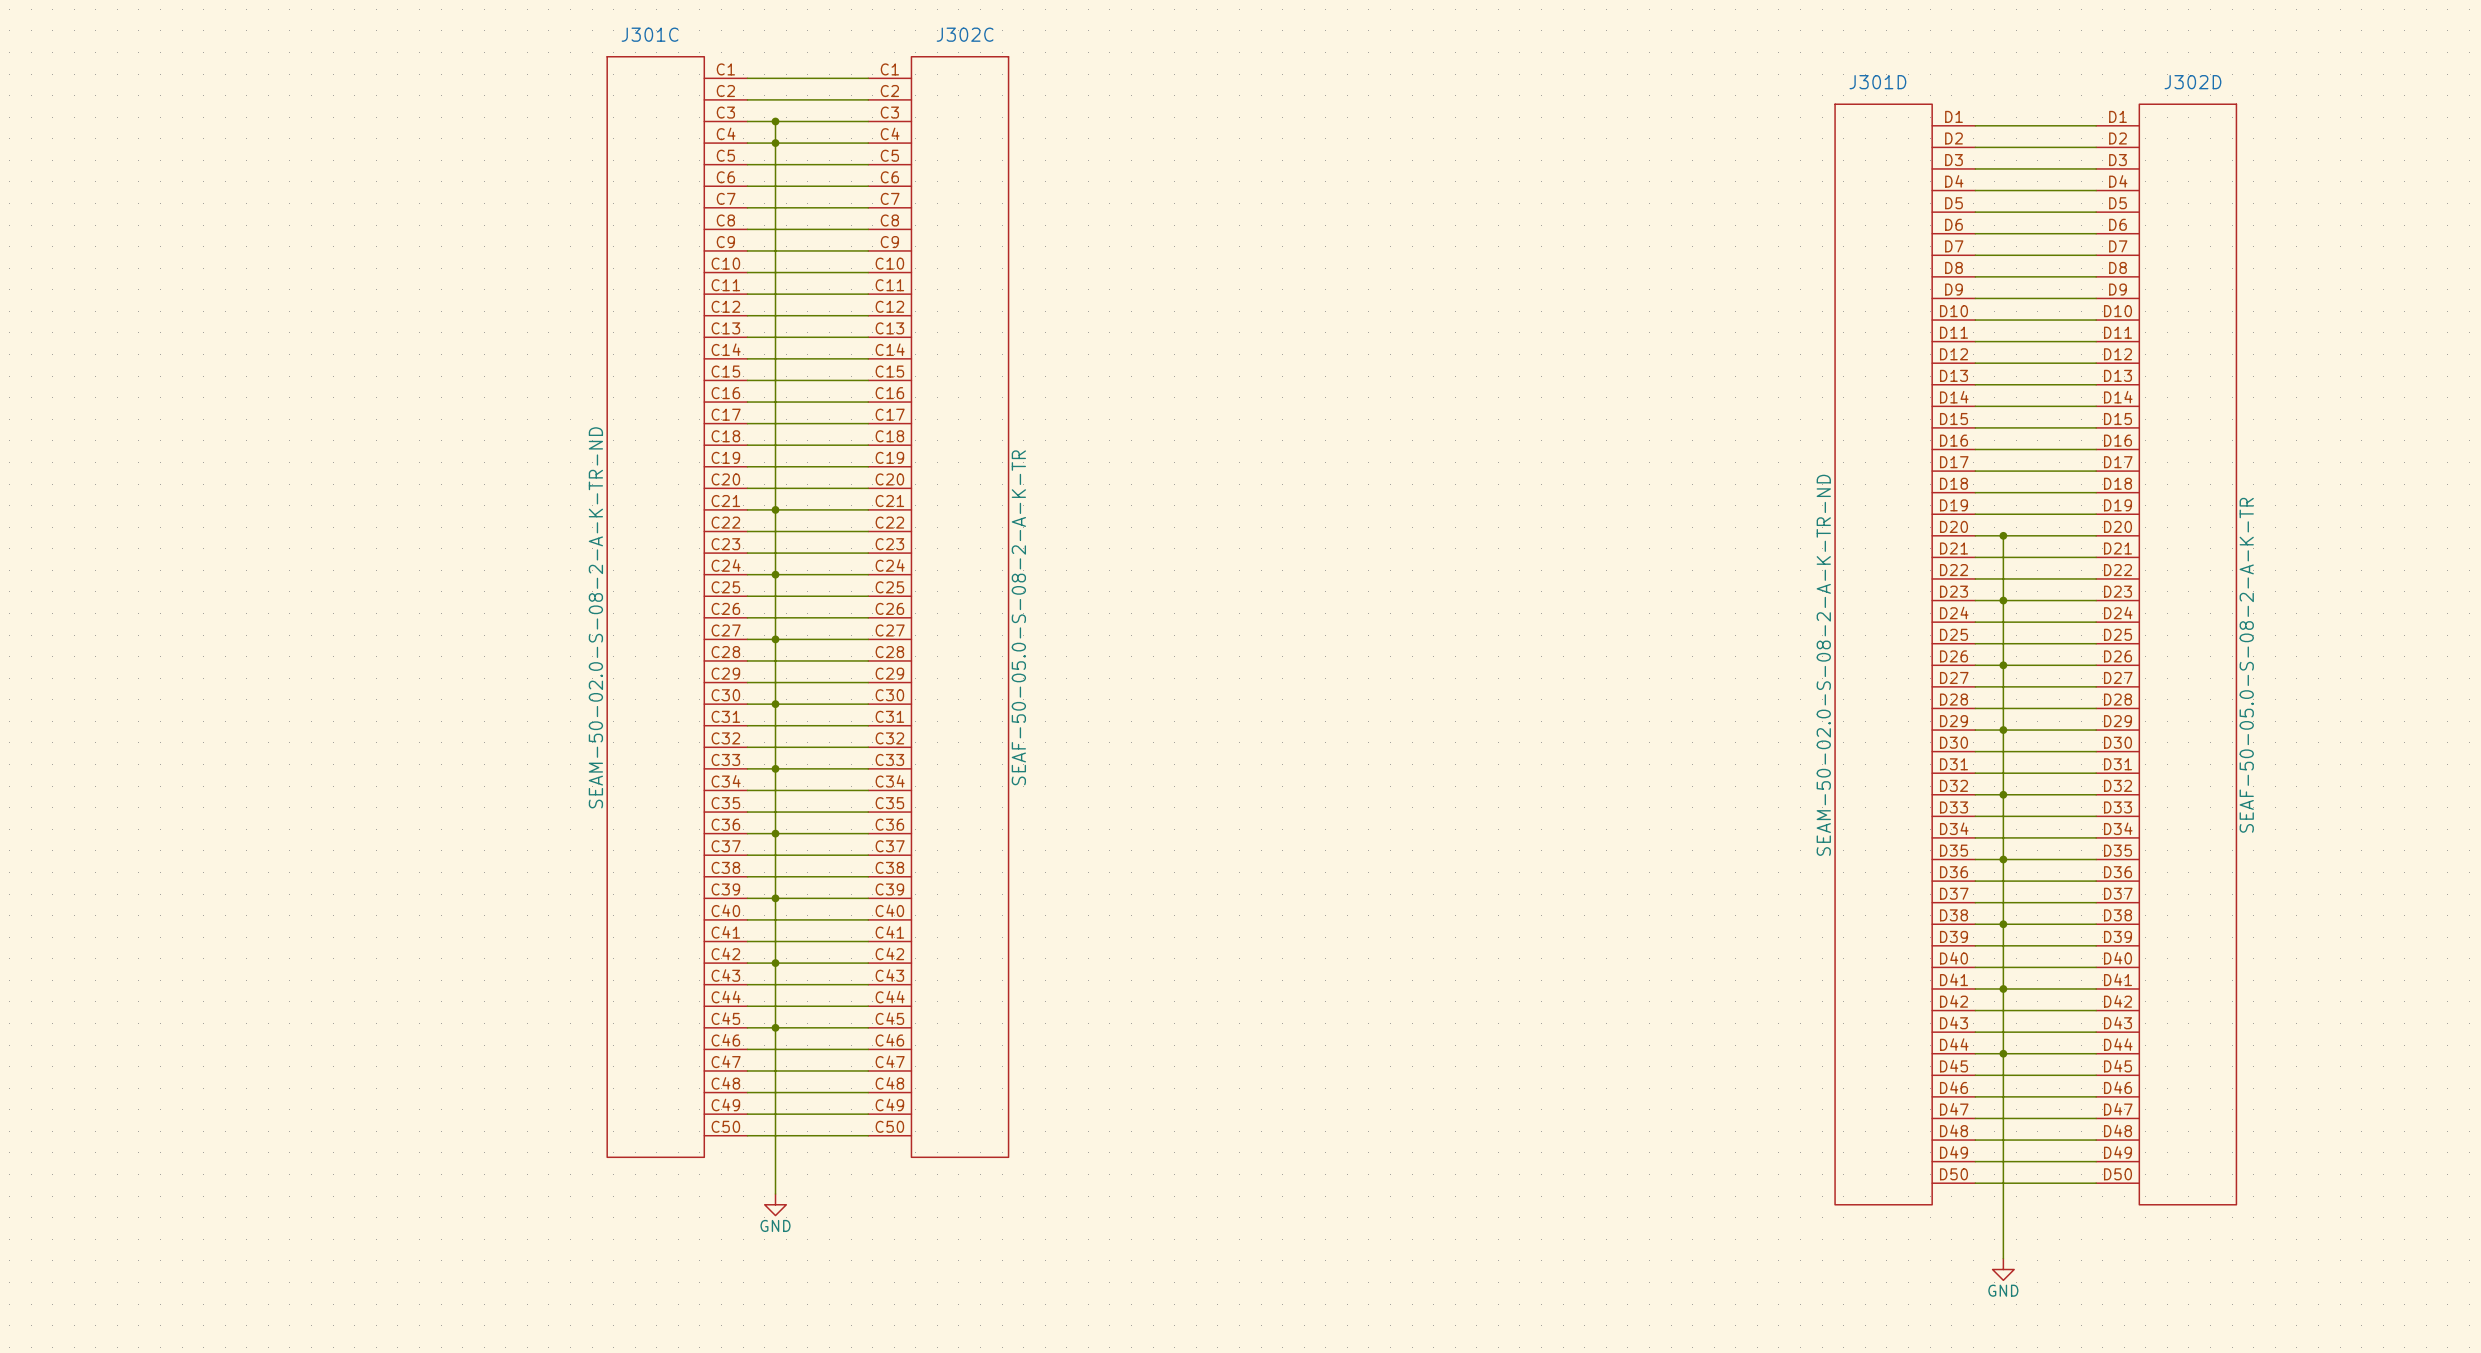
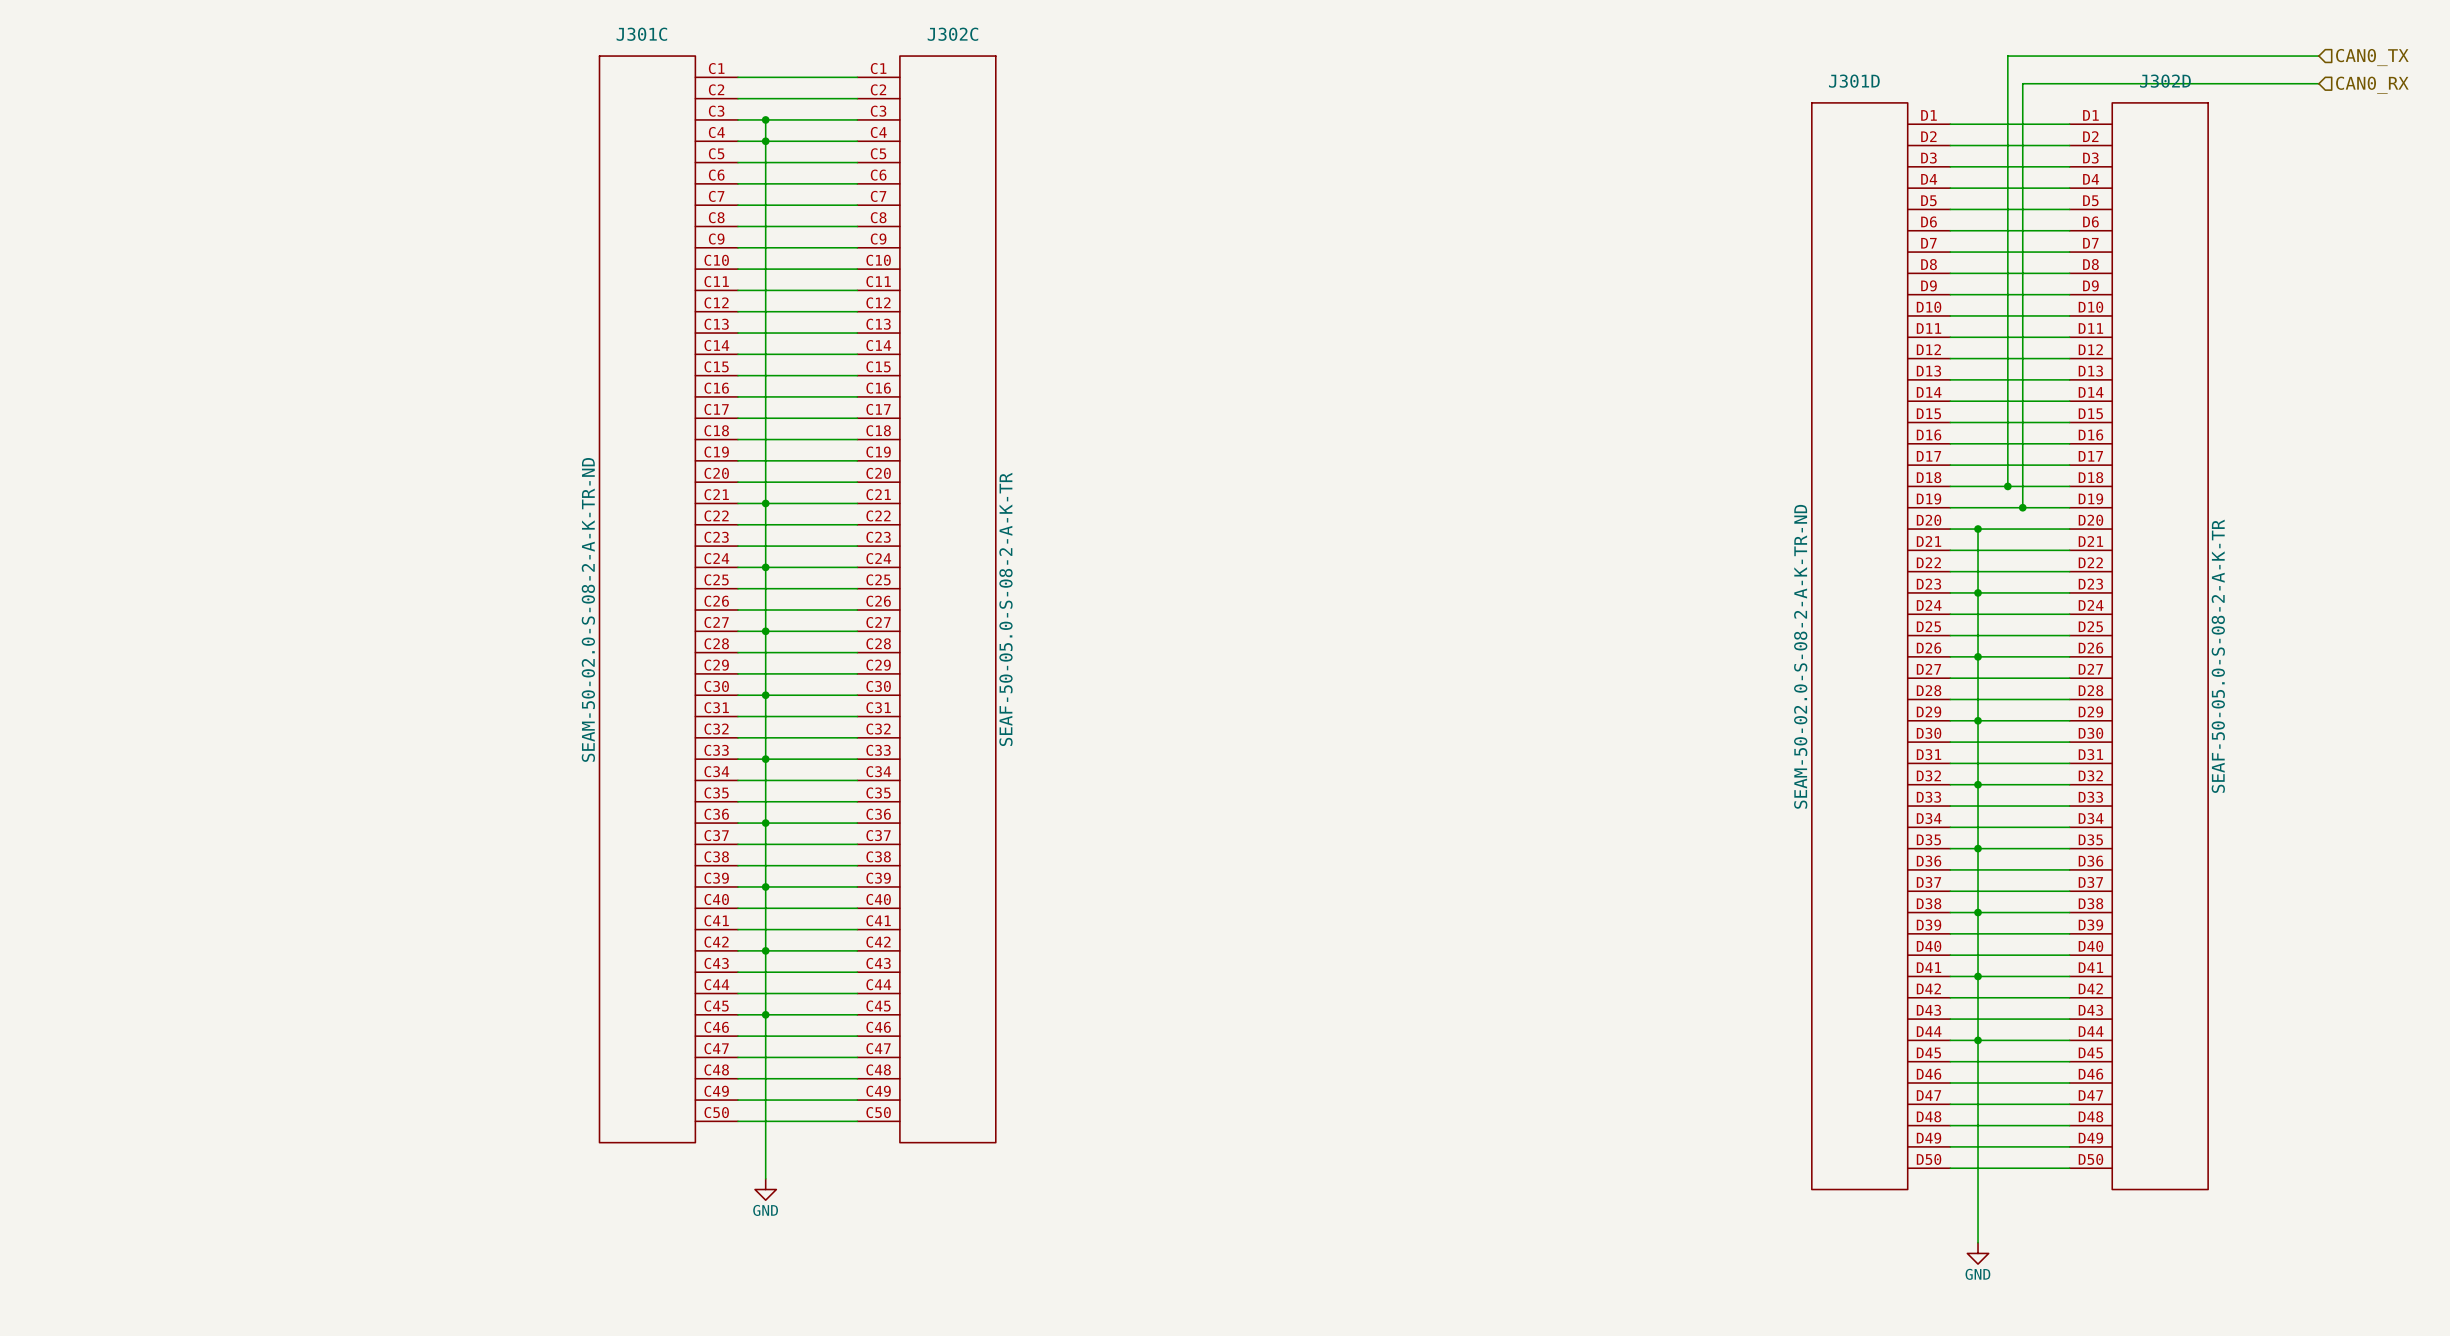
wire: none -> (2318, 56) (2007, 56) (2007, 486)
hierarchical label: none -> CAN0_TX (2372, 57)
wire: none -> (2318, 83) (2022, 83) (2022, 507)
hierarchical label: none -> CAN0_RX (2372, 85)
junction: none -> (2007, 486)
junction: none -> (2022, 507)

